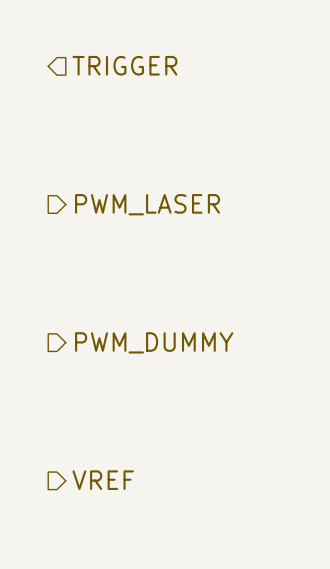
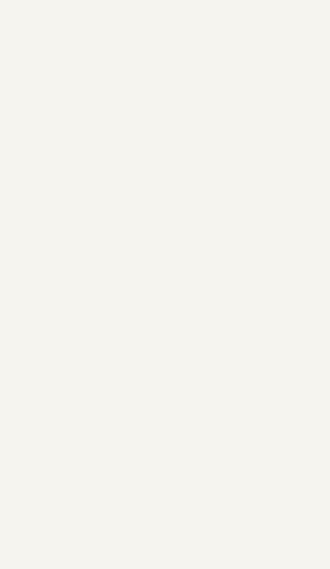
hierarchical label: TRIGGER (124, 65) -> none
hierarchical label: PWM_LASER (147, 204) -> none
hierarchical label: PWM_DUMMY (154, 342) -> none
hierarchical label: VREF (103, 480) -> none

